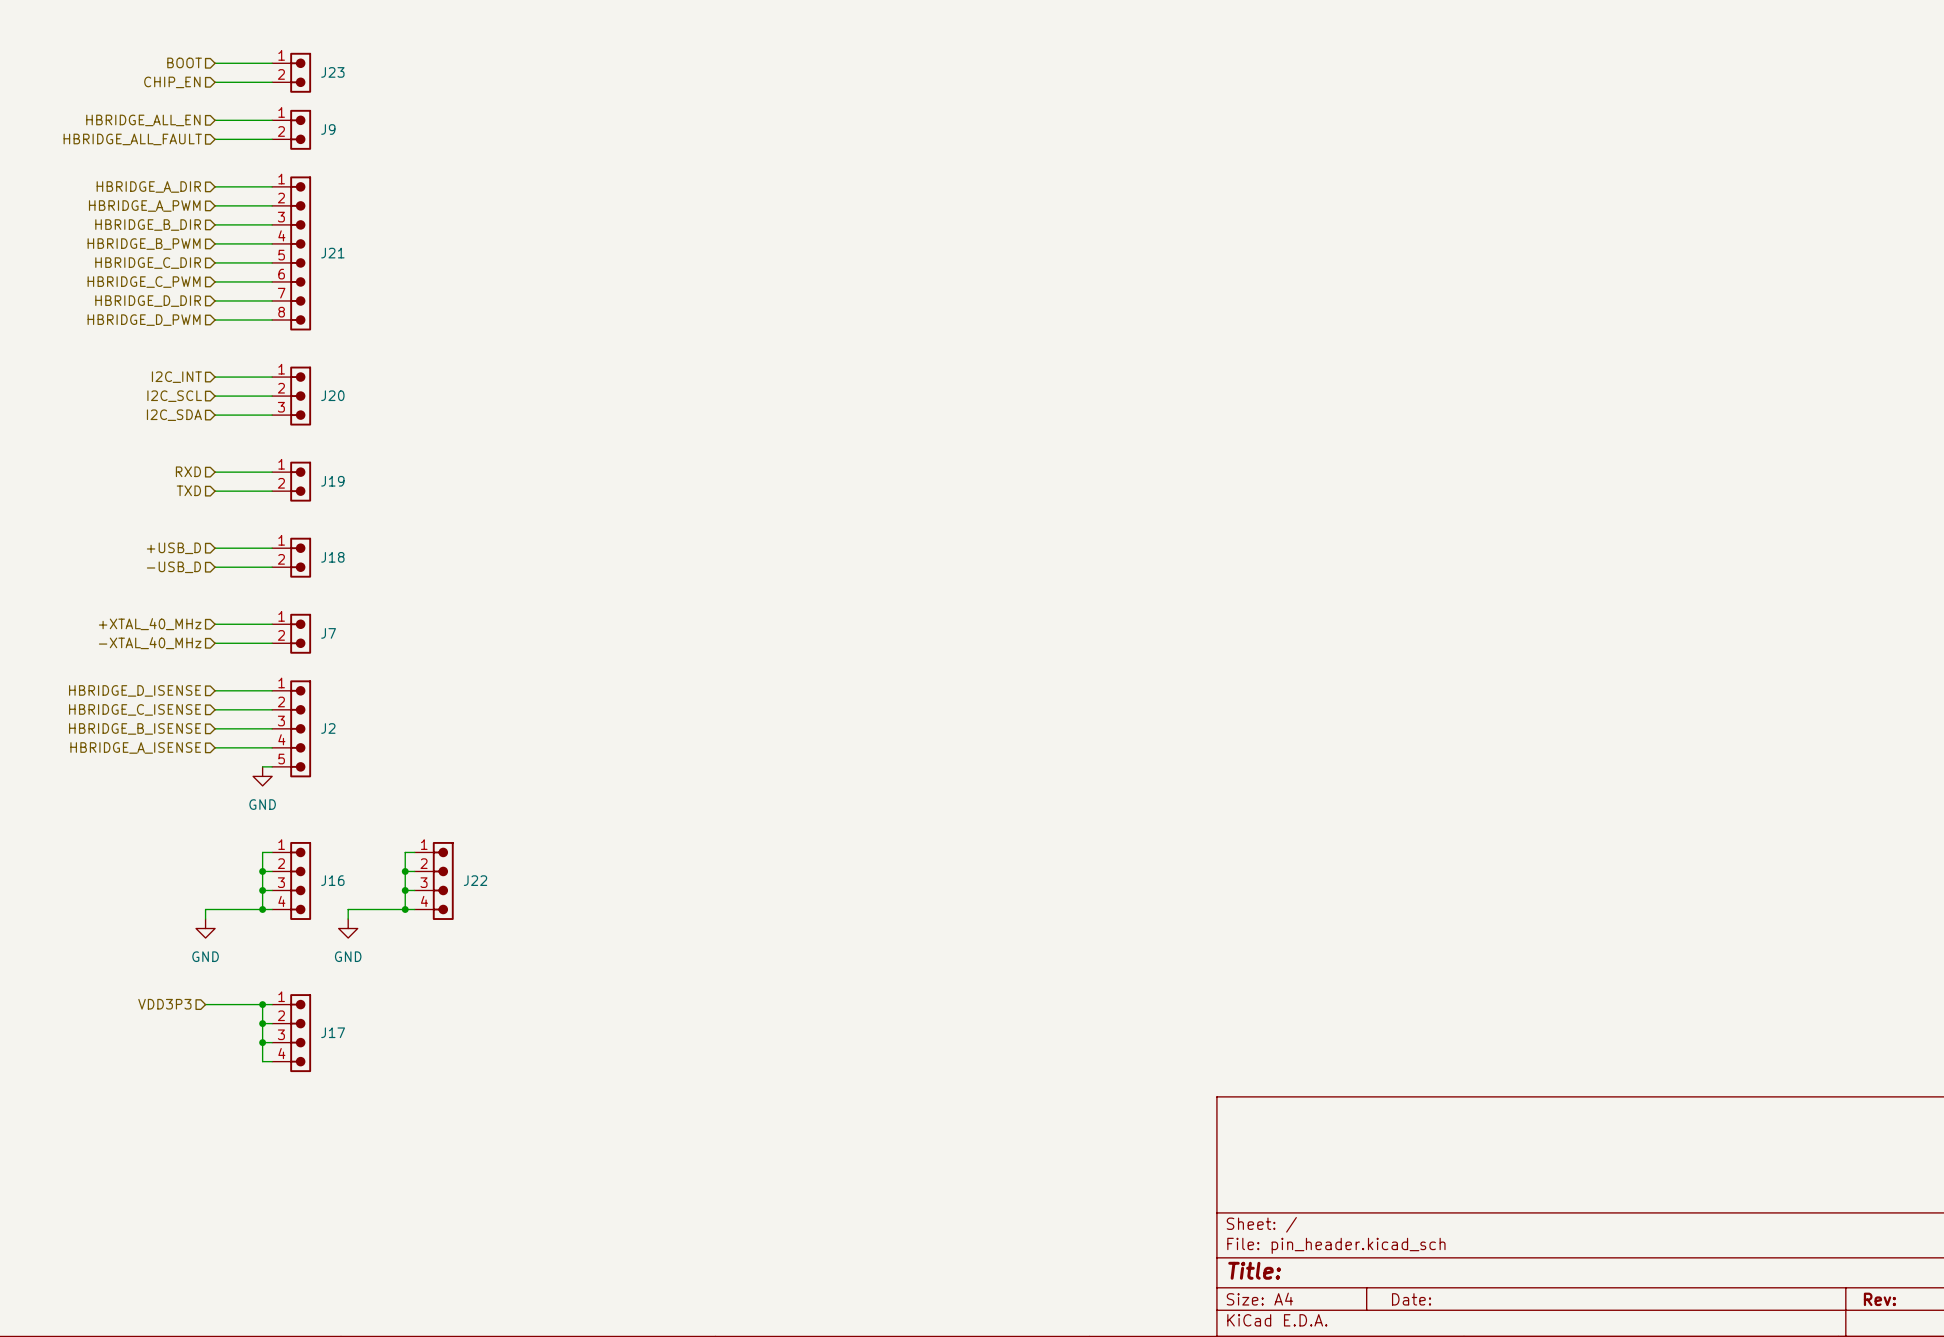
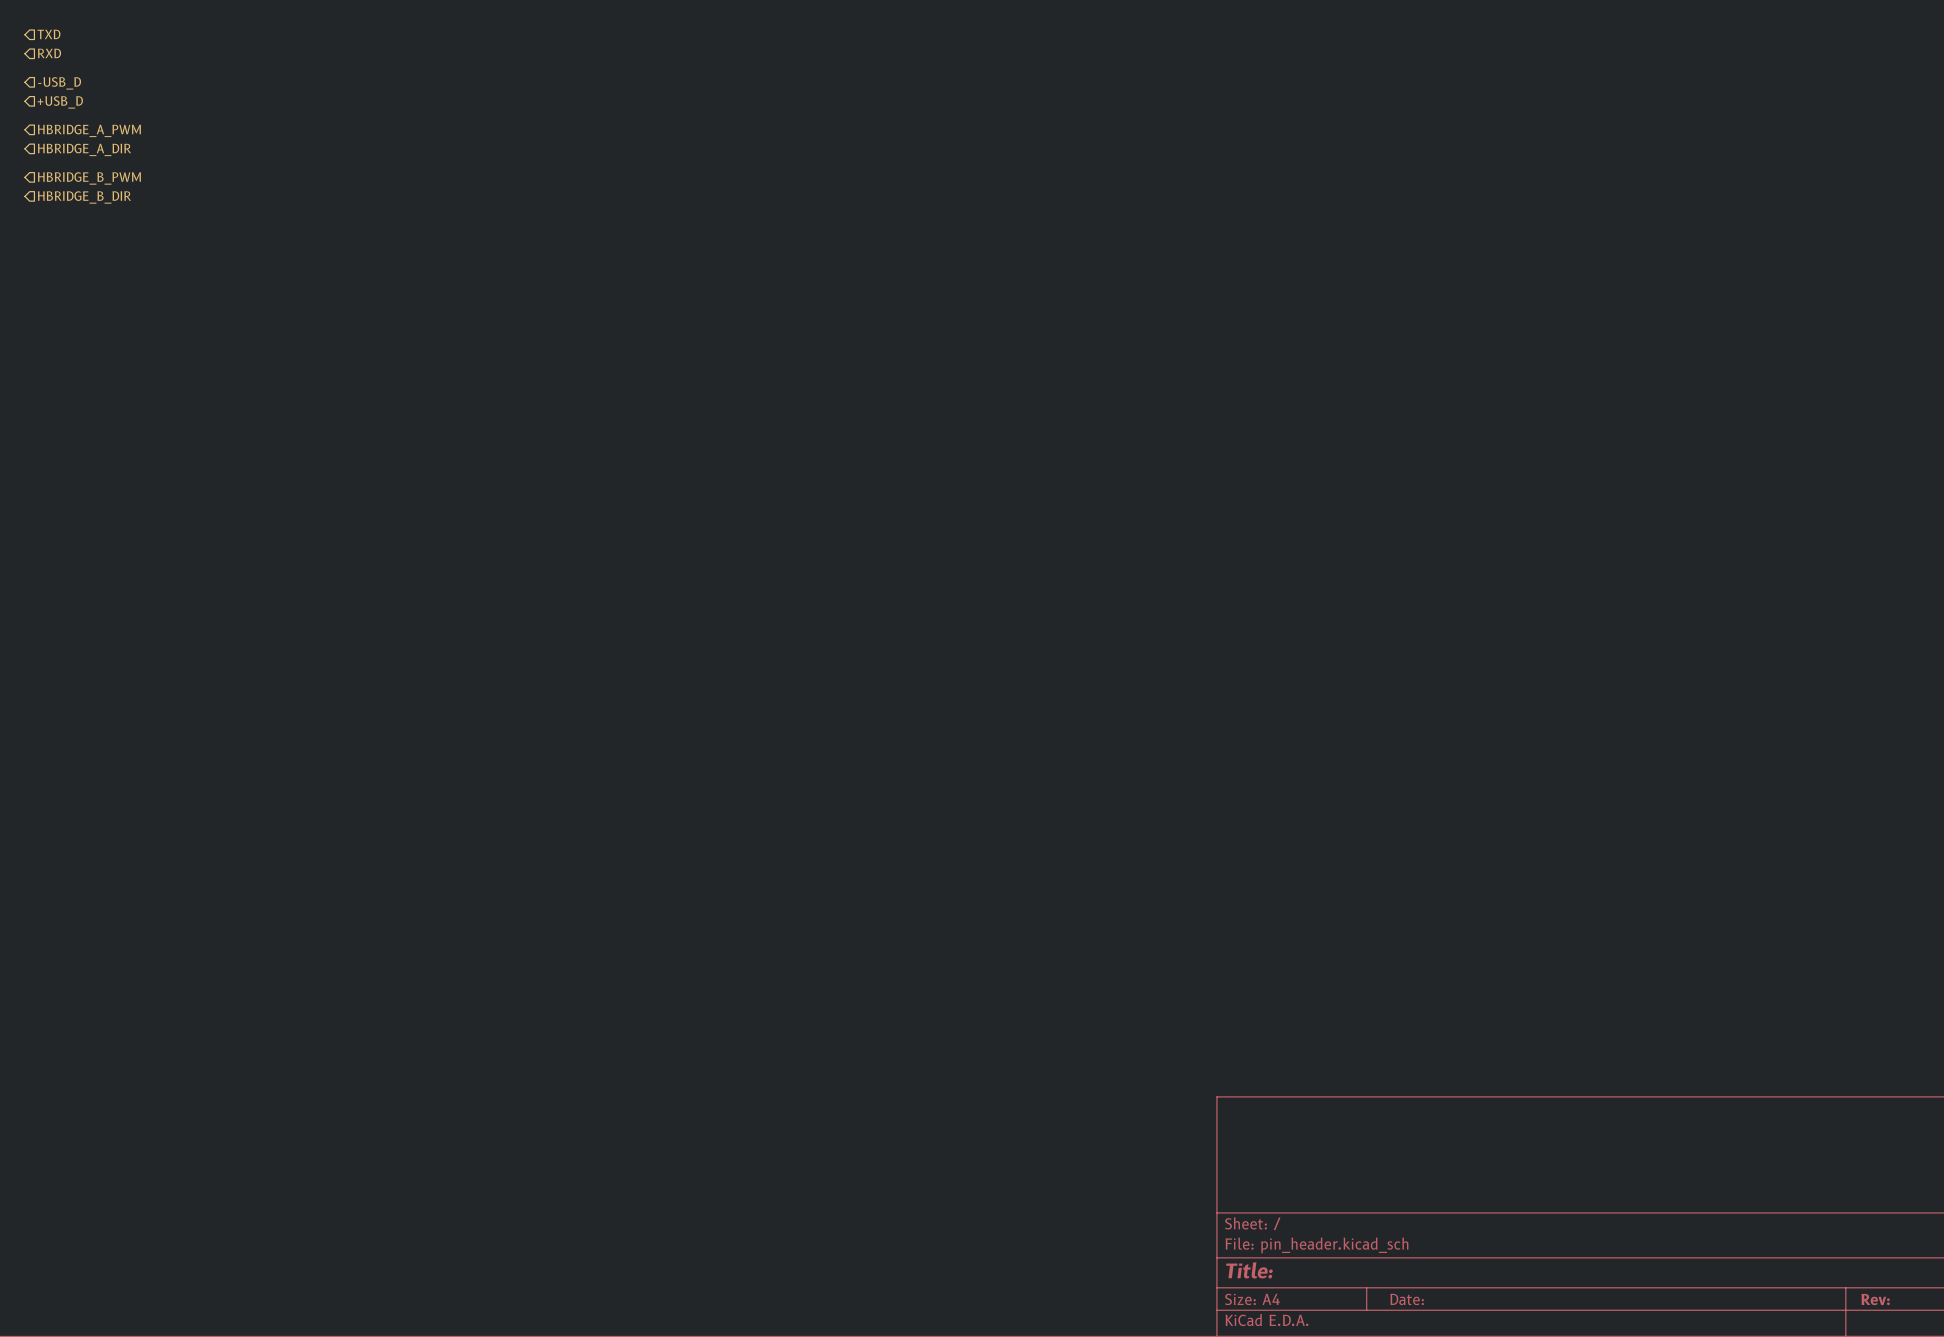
hierarchical label: none -> TXD (48, 34)
hierarchical label: none -> RXD (49, 53)
hierarchical label: BOOT (184, 62) -> none
wire: (215, 63) (272, 63) -> none
J23: (291, 72) -> none
hierarchical label: none -> -USB_D (59, 83)
hierarchical label: CHIP_EN (172, 82) -> none
wire: (215, 82) (272, 82) -> none
hierarchical label: none -> +USB_D (60, 102)
hierarchical label: HBRIDGE_ALL_EN (143, 120) -> none
wire: (215, 120) (272, 120) -> none
J9: (291, 129) -> none
hierarchical label: HBRIDGE_ALL_FAULT (132, 139) -> none
wire: (215, 139) (272, 139) -> none
hierarchical label rotation: 0° (148, 186) -> 180° (84, 149)
wire: (215, 186) (272, 186) -> none
wire: (215, 205) (272, 205) -> none
hierarchical label rotation: 0° (144, 206) -> 180° (89, 130)
wire: (215, 224) (272, 224) -> none
hierarchical label rotation: 0° (148, 225) -> 180° (84, 197)
wire: (215, 243) (272, 243) -> none
hierarchical label rotation: 0° (144, 244) -> 180° (89, 178)
J21: (291, 253) -> none
wire: (215, 262) (272, 262) -> none
hierarchical label: HBRIDGE_C_DIR (148, 263) -> none
wire: (215, 281) (272, 281) -> none
hierarchical label: HBRIDGE_C_PWM (144, 282) -> none
wire: (215, 300) (272, 300) -> none
hierarchical label: HBRIDGE_D_DIR (148, 301) -> none
hierarchical label: HBRIDGE_D_PWM (144, 320) -> none
wire: (215, 320) (272, 320) -> none
hierarchical label: I2C_INT (176, 377) -> none
wire: (215, 377) (272, 377) -> none
hierarchical label: I2C_SCL (174, 396) -> none
wire: (215, 396) (272, 396) -> none
J20: (291, 396) -> none
hierarchical label: I2C_SDA (174, 415) -> none
wire: (215, 415) (272, 415) -> none
hierarchical label: RXD (188, 471) -> none
wire: (215, 472) (272, 472) -> none
J19: (291, 481) -> none
hierarchical label: TXD (188, 490) -> none
wire: (215, 491) (272, 491) -> none
hierarchical label: +USB_D (173, 548) -> none
wire: (215, 548) (272, 548) -> none
J18: (291, 557) -> none
hierarchical label: -USB_D (173, 567) -> none
wire: (215, 567) (272, 567) -> none
hierarchical label: +XTAL_40_MHz (150, 624) -> none
wire: (215, 624) (272, 624) -> none
J7: (291, 633) -> none
hierarchical label: -XTAL_40_MHz (150, 643) -> none
wire: (215, 643) (272, 643) -> none
hierarchical label: HBRIDGE_D_ISENSE (135, 690) -> none
wire: (215, 690) (272, 690) -> none
hierarchical label: HBRIDGE_C_ISENSE (135, 709) -> none
wire: (215, 709) (272, 709) -> none
hierarchical label: HBRIDGE_B_ISENSE (135, 728) -> none
wire: (215, 728) (272, 728) -> none
J2: (291, 728) -> none
hierarchical label: HBRIDGE_A_ISENSE (135, 747) -> none
wire: (215, 747) (272, 747) -> none
wire: (262, 766) (272, 766) -> none
power symbol: GND (262, 776) -> none
wire: (272, 852) (262, 852) (262, 909) -> none
wire: (414, 852) (405, 852) (405, 909) -> none
wire: (262, 871) (272, 871) -> none
junction: (262, 871) -> none
wire: (405, 871) (414, 871) -> none
junction: (405, 871) -> none
J16: (291, 880) -> none
J22: (434, 880) -> none
wire: (262, 890) (272, 890) -> none
junction: (262, 890) -> none
wire: (405, 890) (414, 890) -> none
junction: (405, 890) -> none
junction: (262, 909) -> none
wire: (272, 909) (205, 909) (205, 919) -> none
junction: (405, 909) -> none
wire: (414, 909) (348, 909) (348, 919) -> none
power symbol: GND (205, 928) -> none
power symbol: GND (348, 928) -> none
hierarchical label: VDD3P3 (164, 1004) -> none
wire: (205, 1004) (272, 1004) -> none
wire: (262, 1004) (262, 1061) (272, 1061) -> none
junction: (262, 1004) -> none
wire: (262, 1023) (272, 1023) -> none
junction: (262, 1023) -> none
J17: (291, 1033) -> none
wire: (262, 1042) (272, 1042) -> none
junction: (262, 1042) -> none

